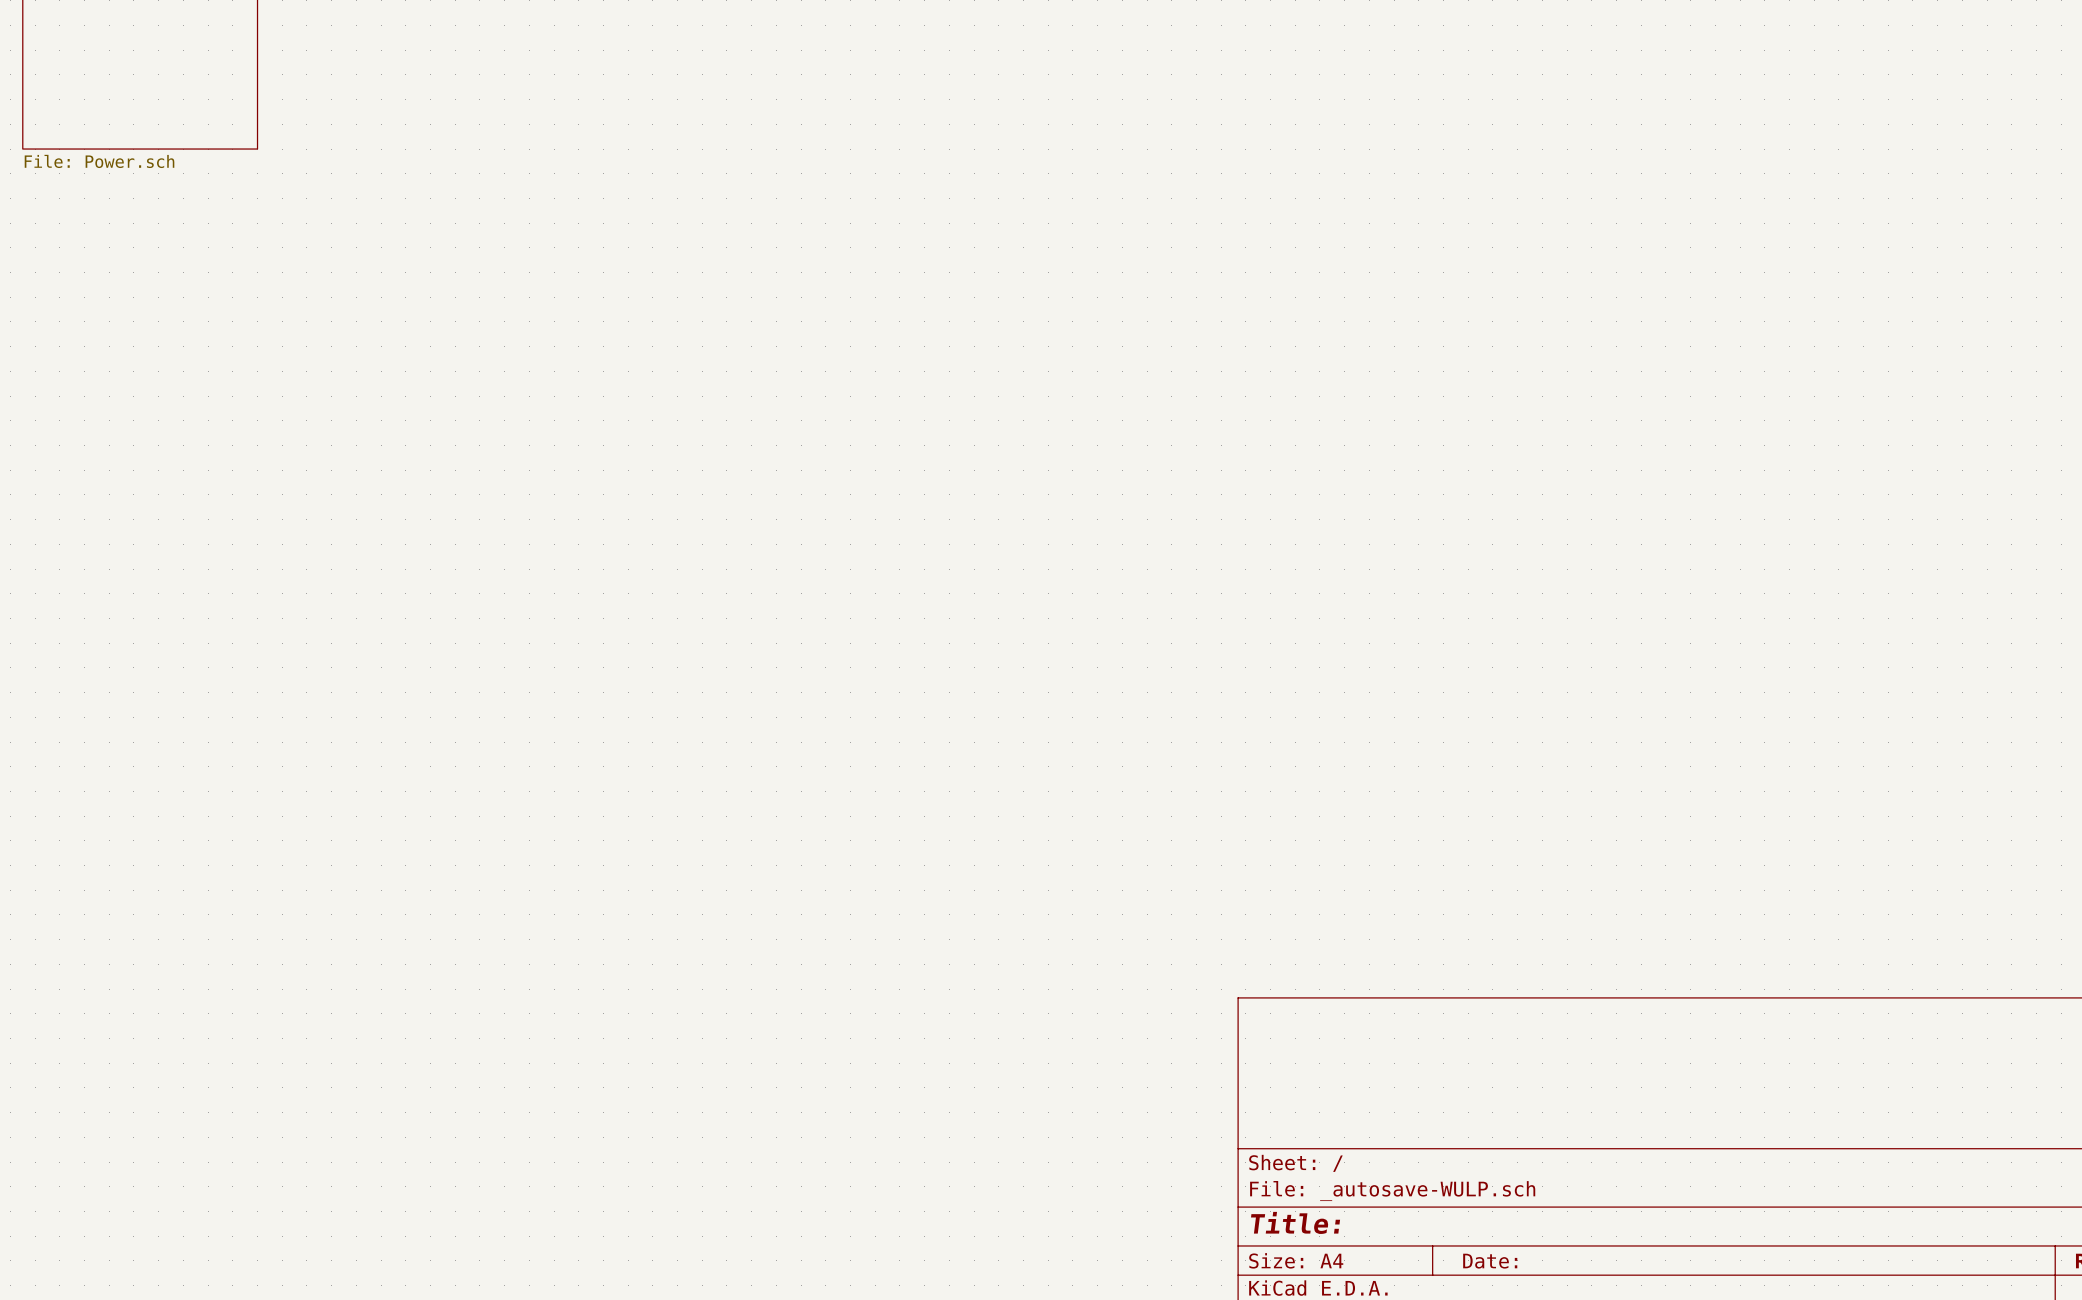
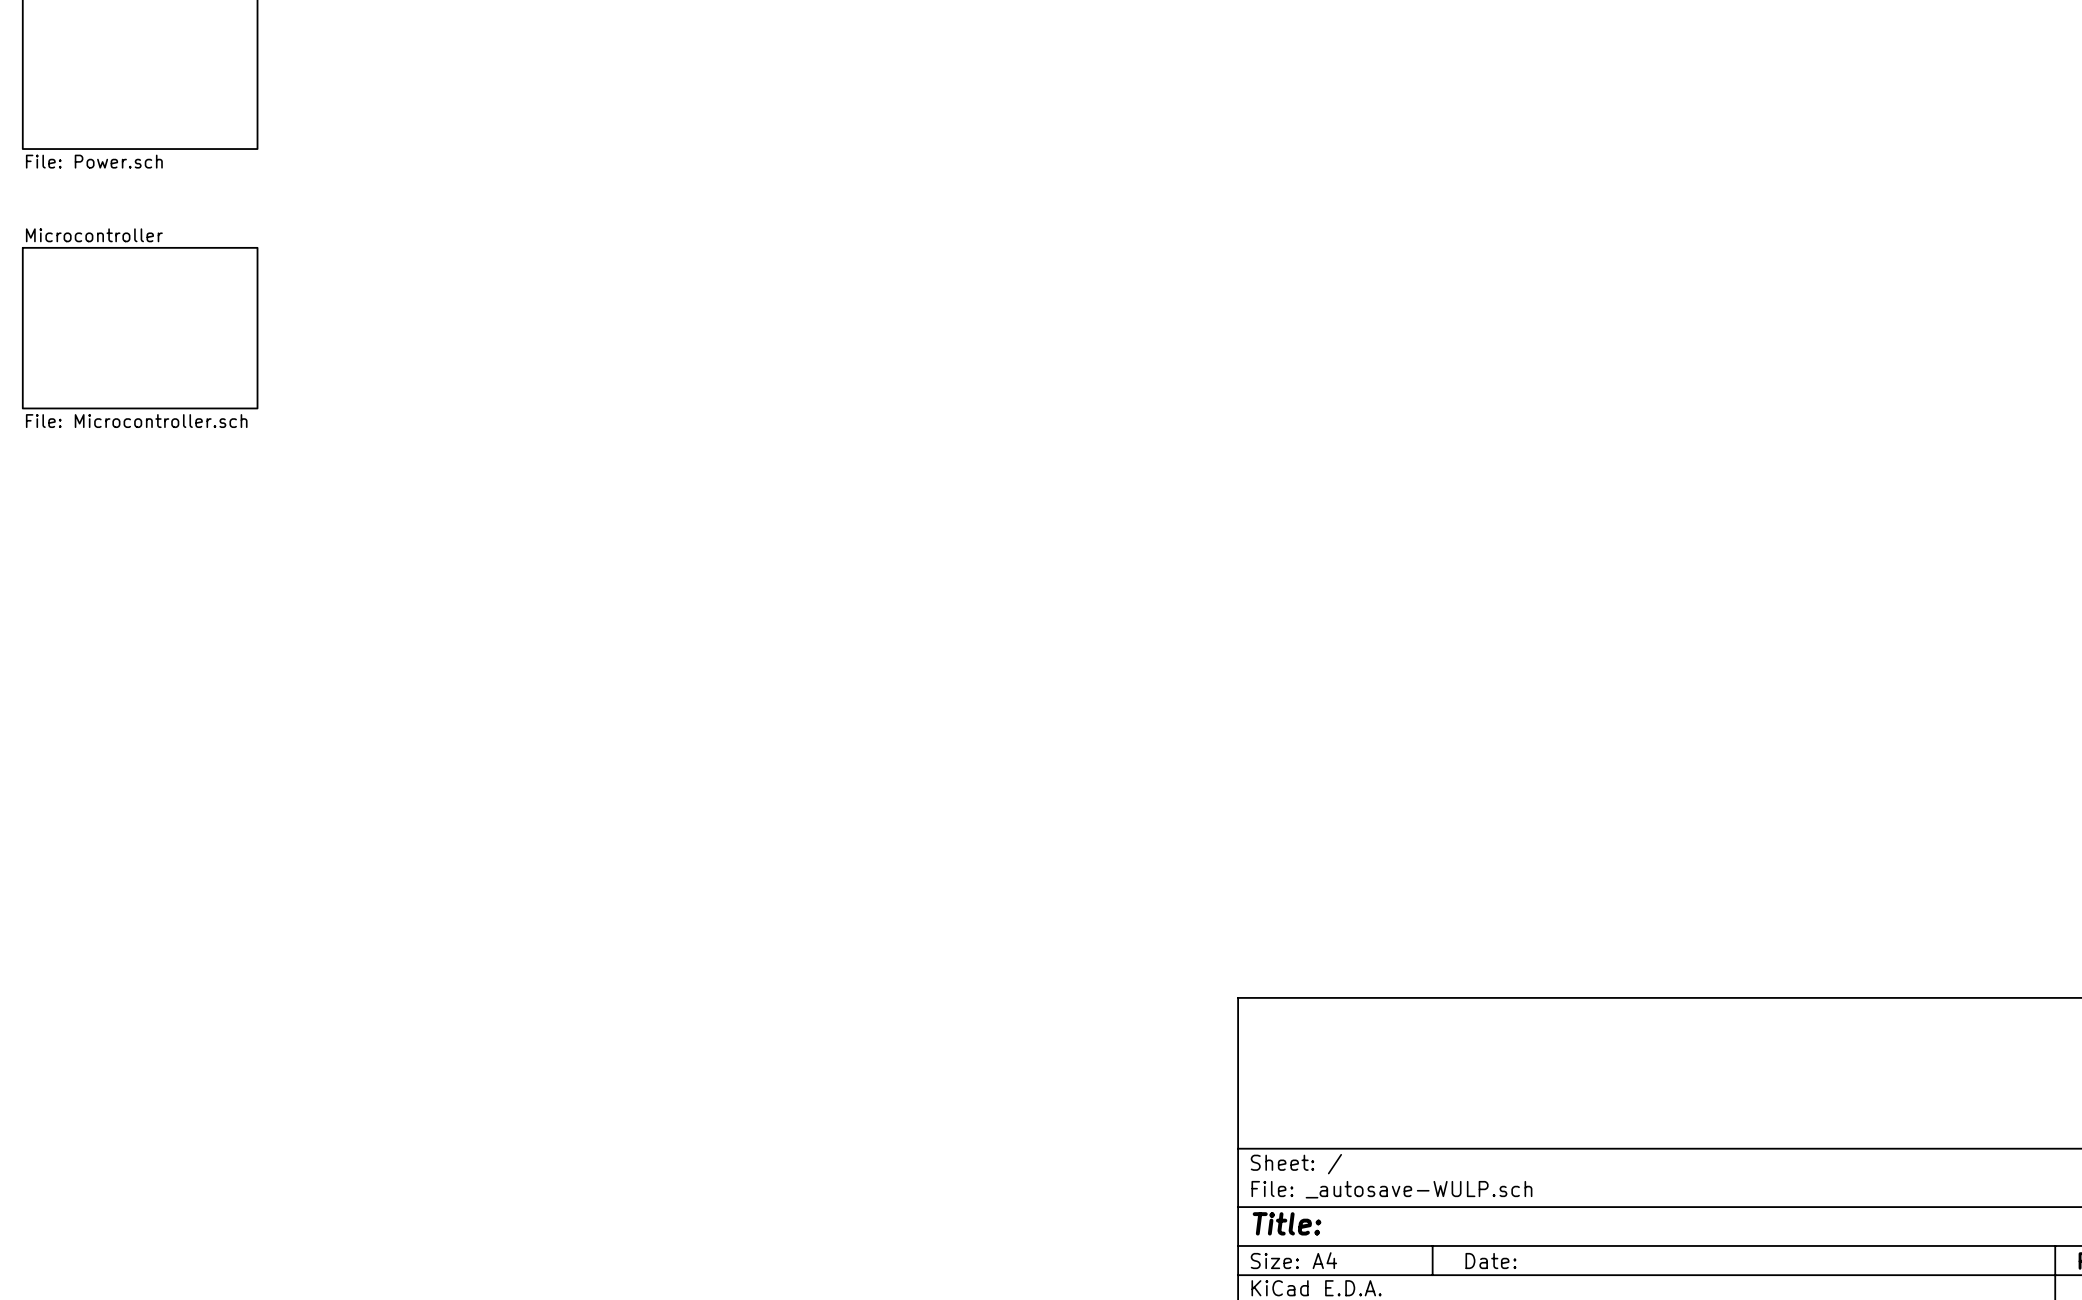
sheet Microcontroller: none -> File: Microcontroller.sch (140, 328)

